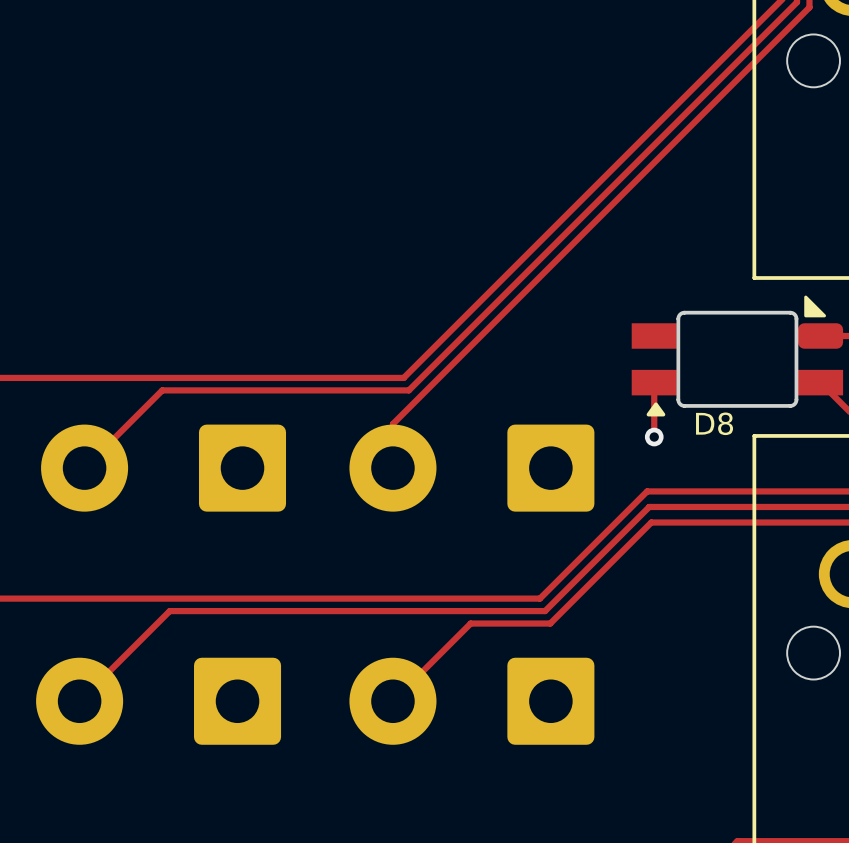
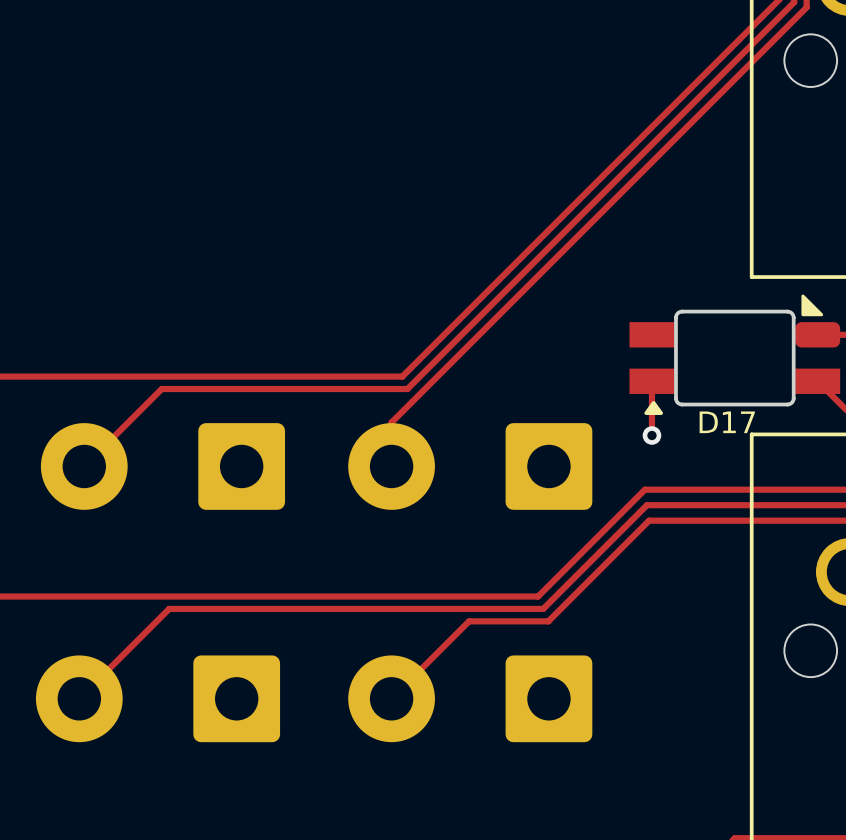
D8 name: D8 (714, 423) -> D17 (727, 422)

